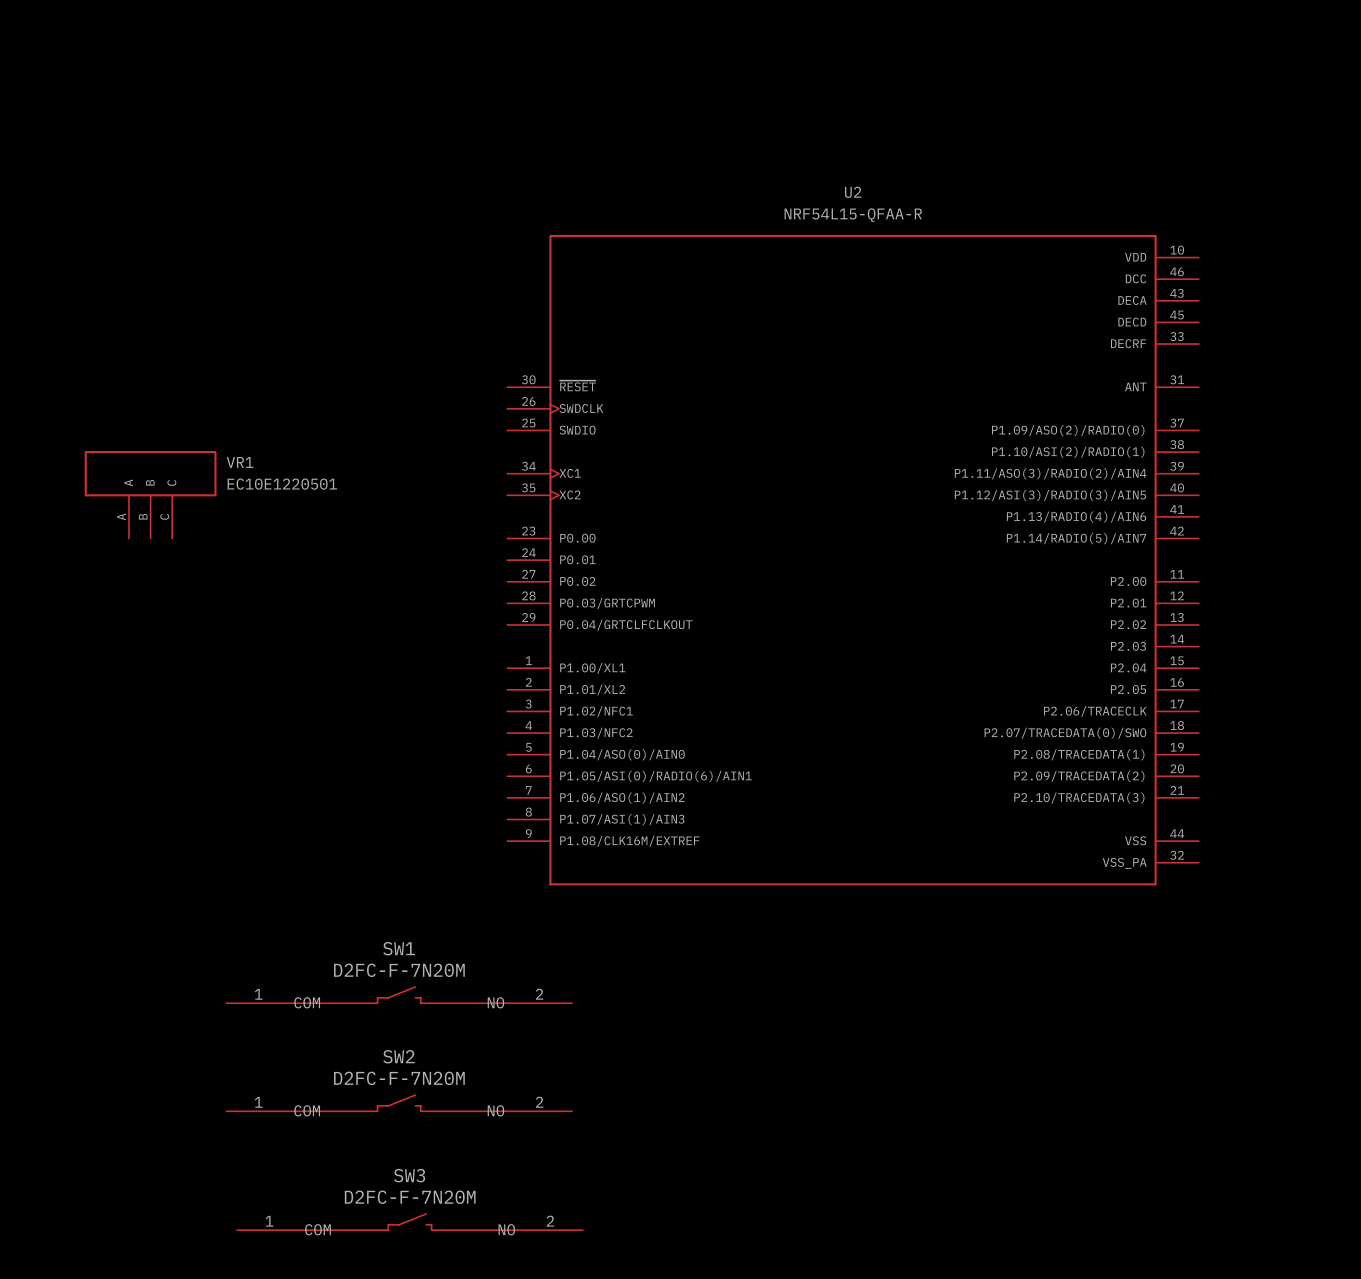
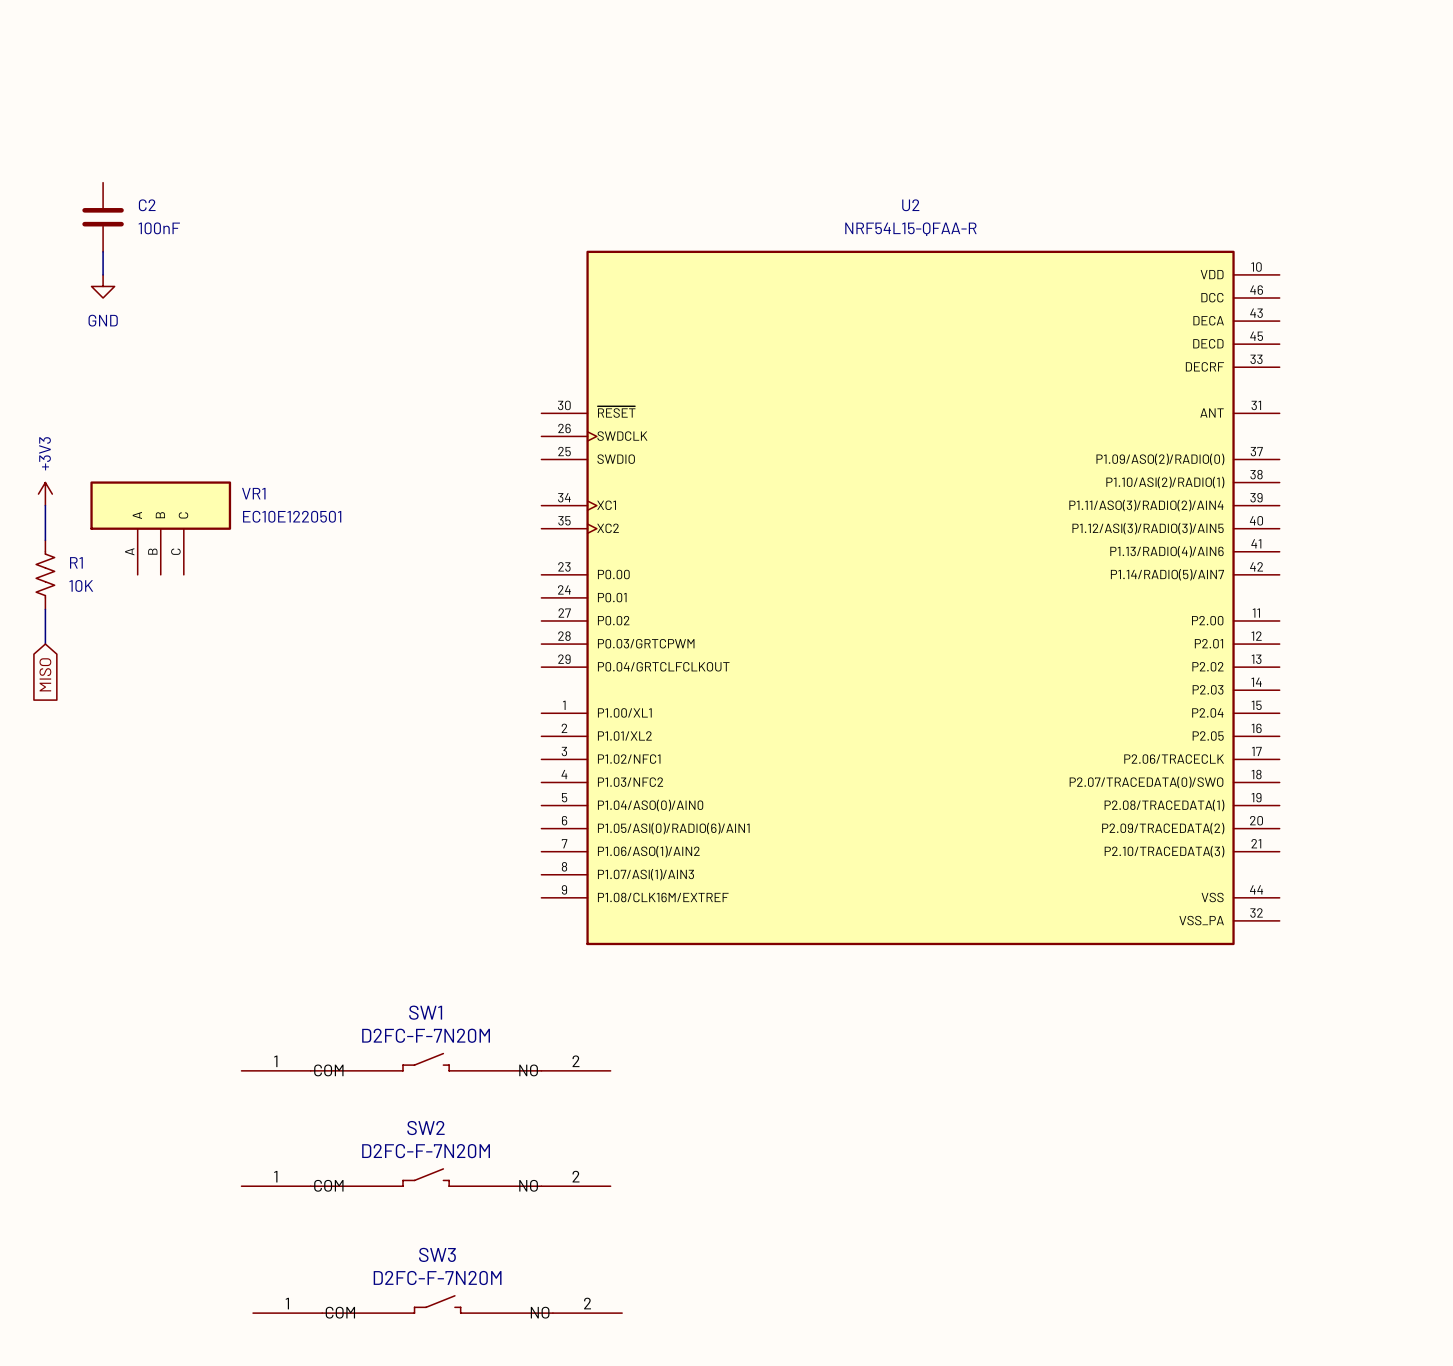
C2: none -> 100nF (103, 217)
wire: none -> (103, 251) (103, 274)
power symbol: none -> GND (103, 286)
power symbol: none -> +3V3 (45, 494)
wire: none -> (45, 505) (45, 540)
R1: none -> 10K (45, 574)
wire: none -> (45, 609) (45, 644)
global label: none -> MISO (45, 674)

